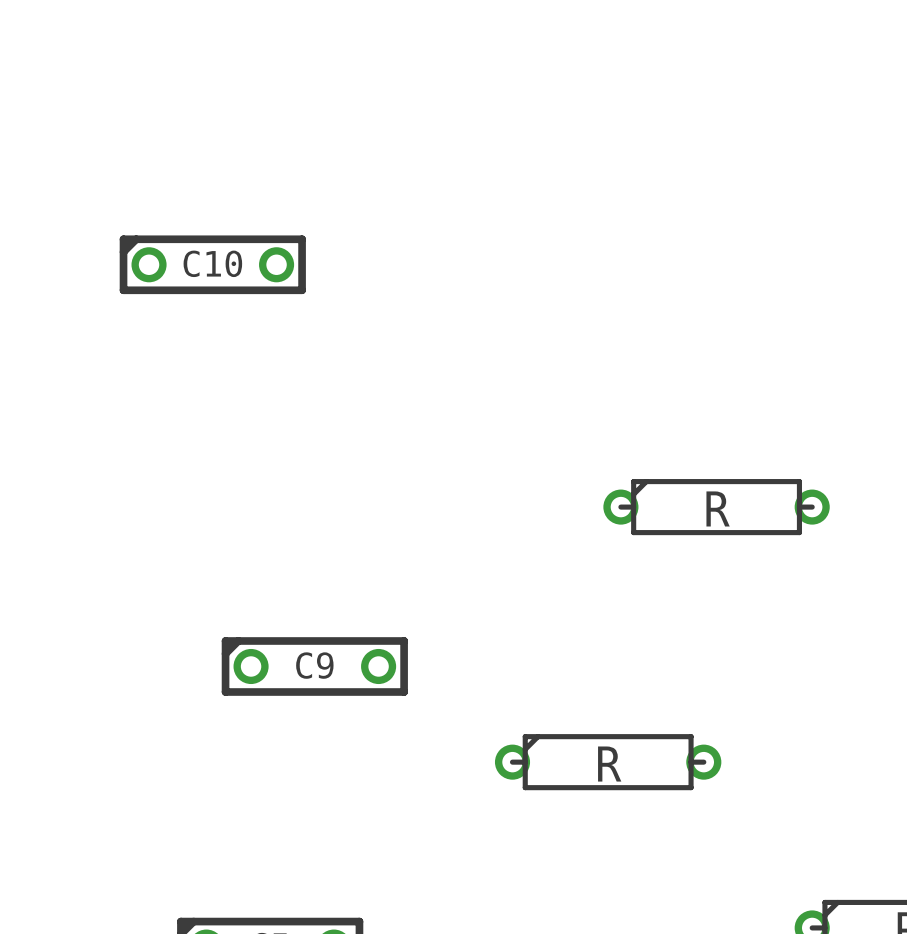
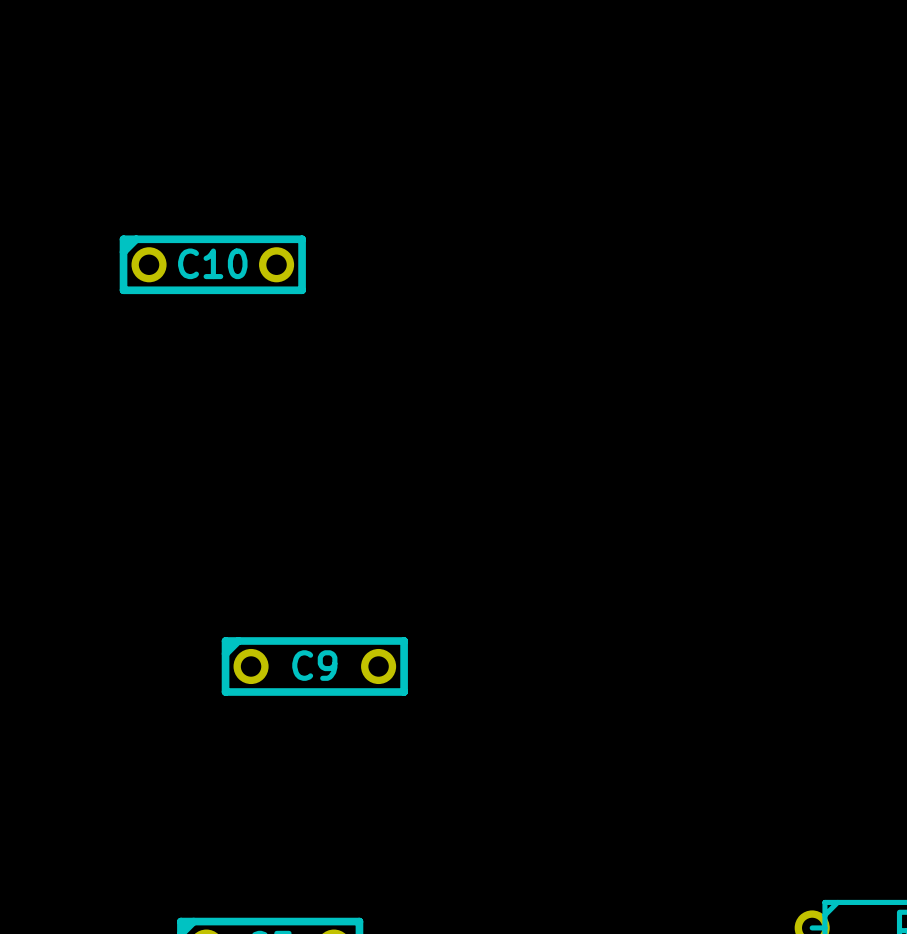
part: R (716, 507) -> none
part: R (608, 762) -> none

